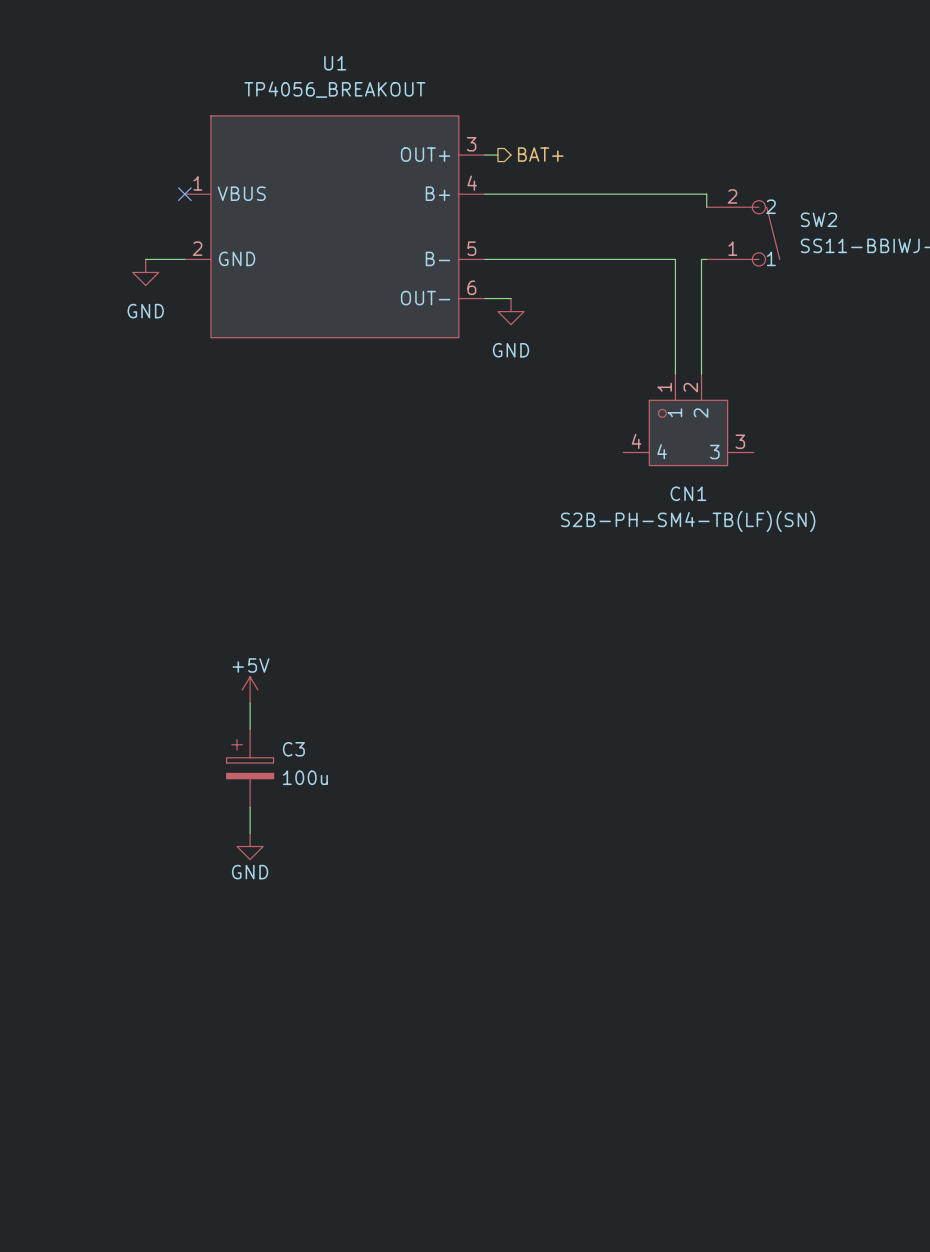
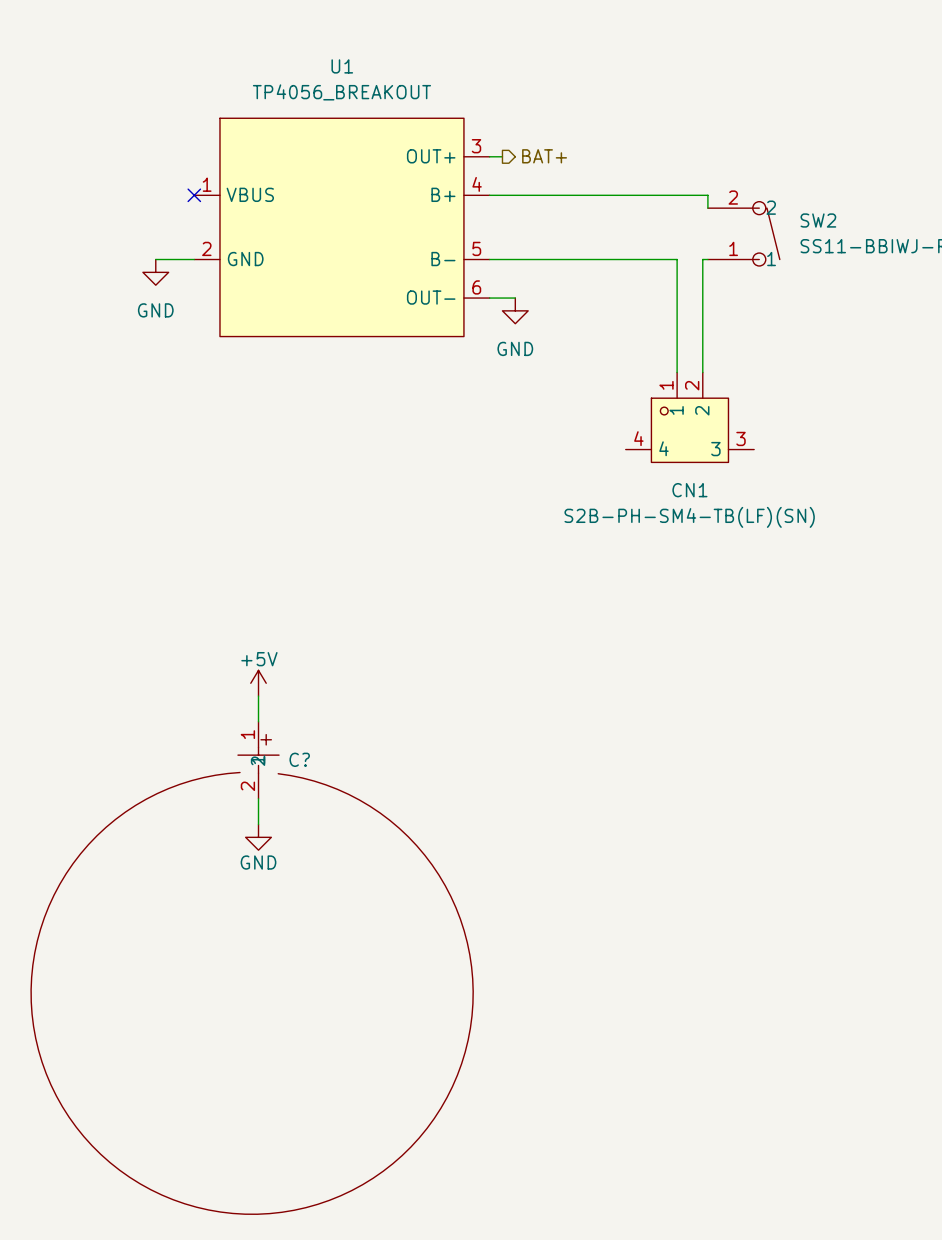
C3: 100u (250, 768) -> none
C?: none -> (252, 968)

